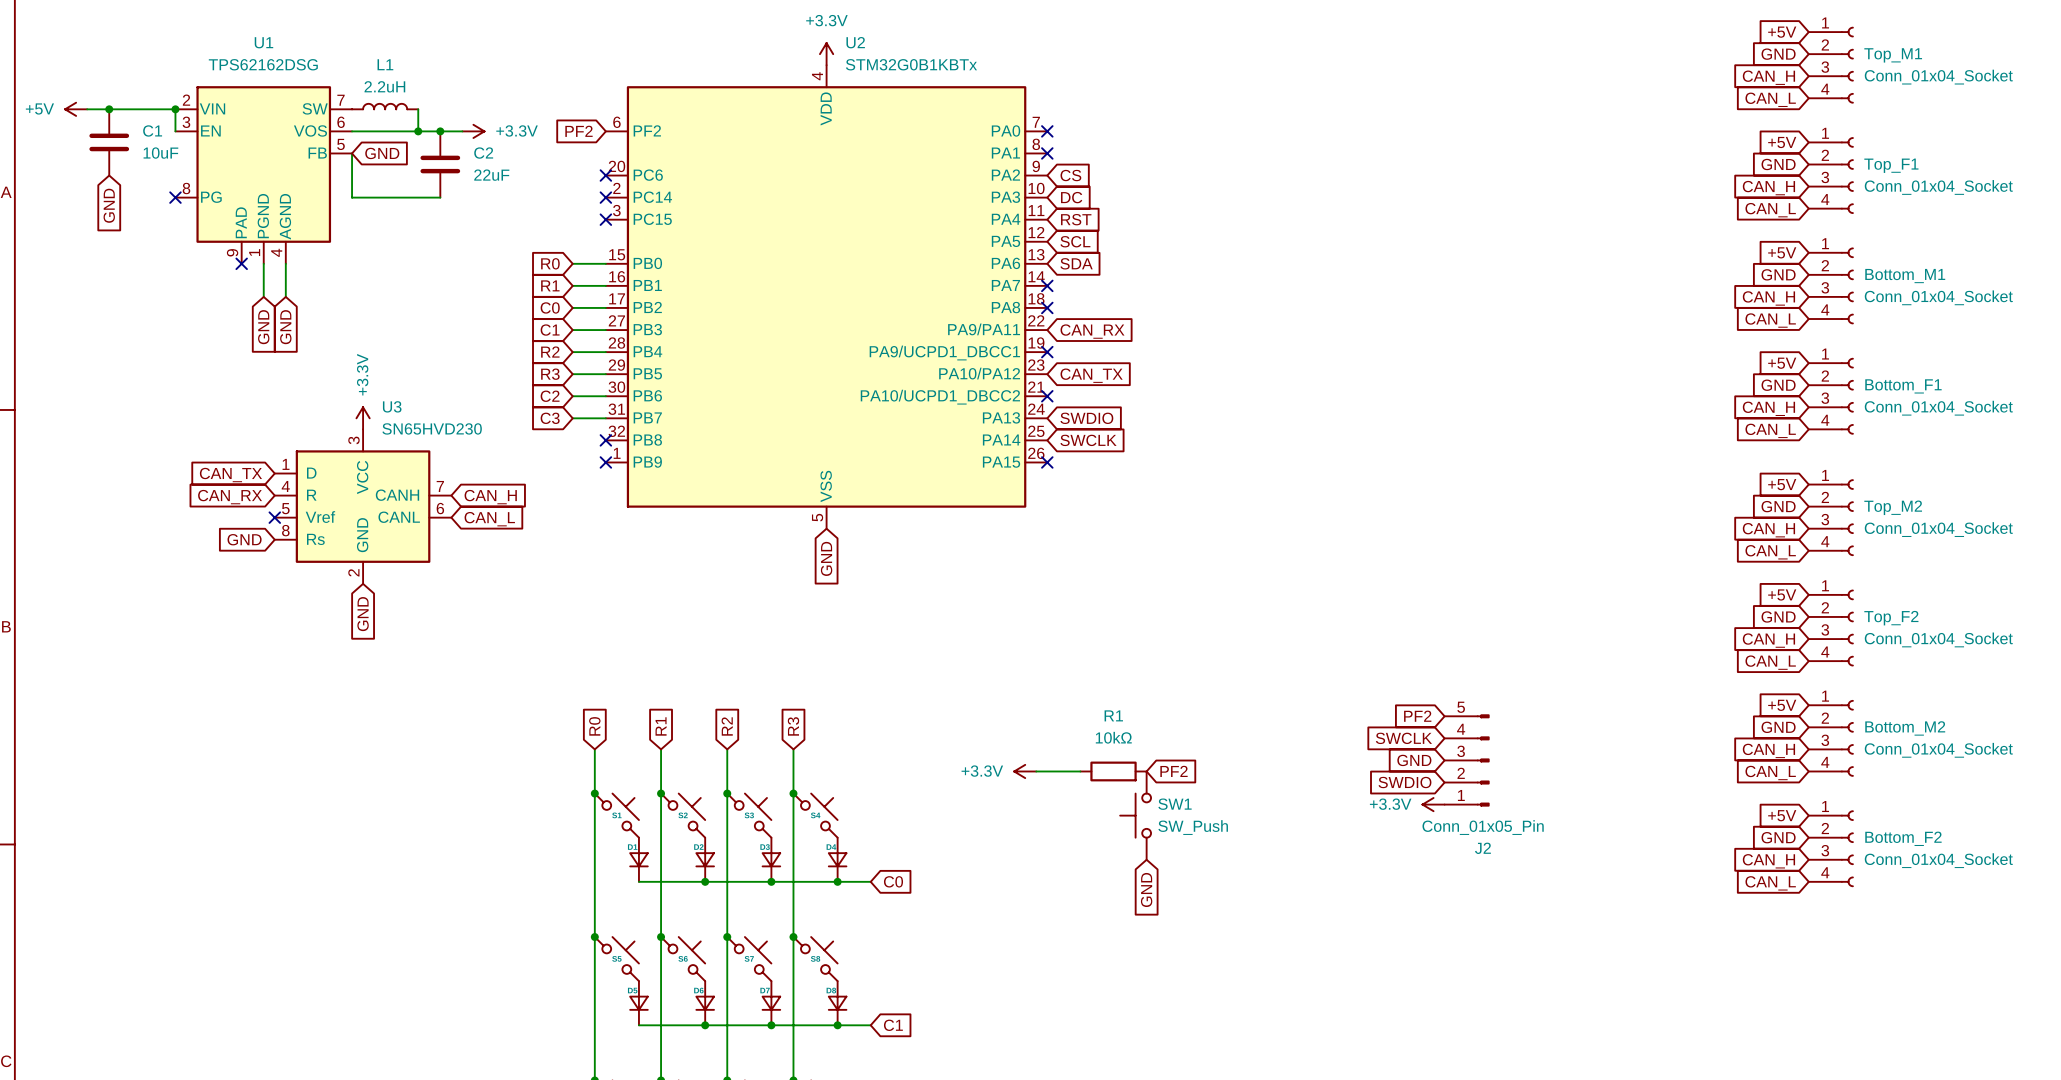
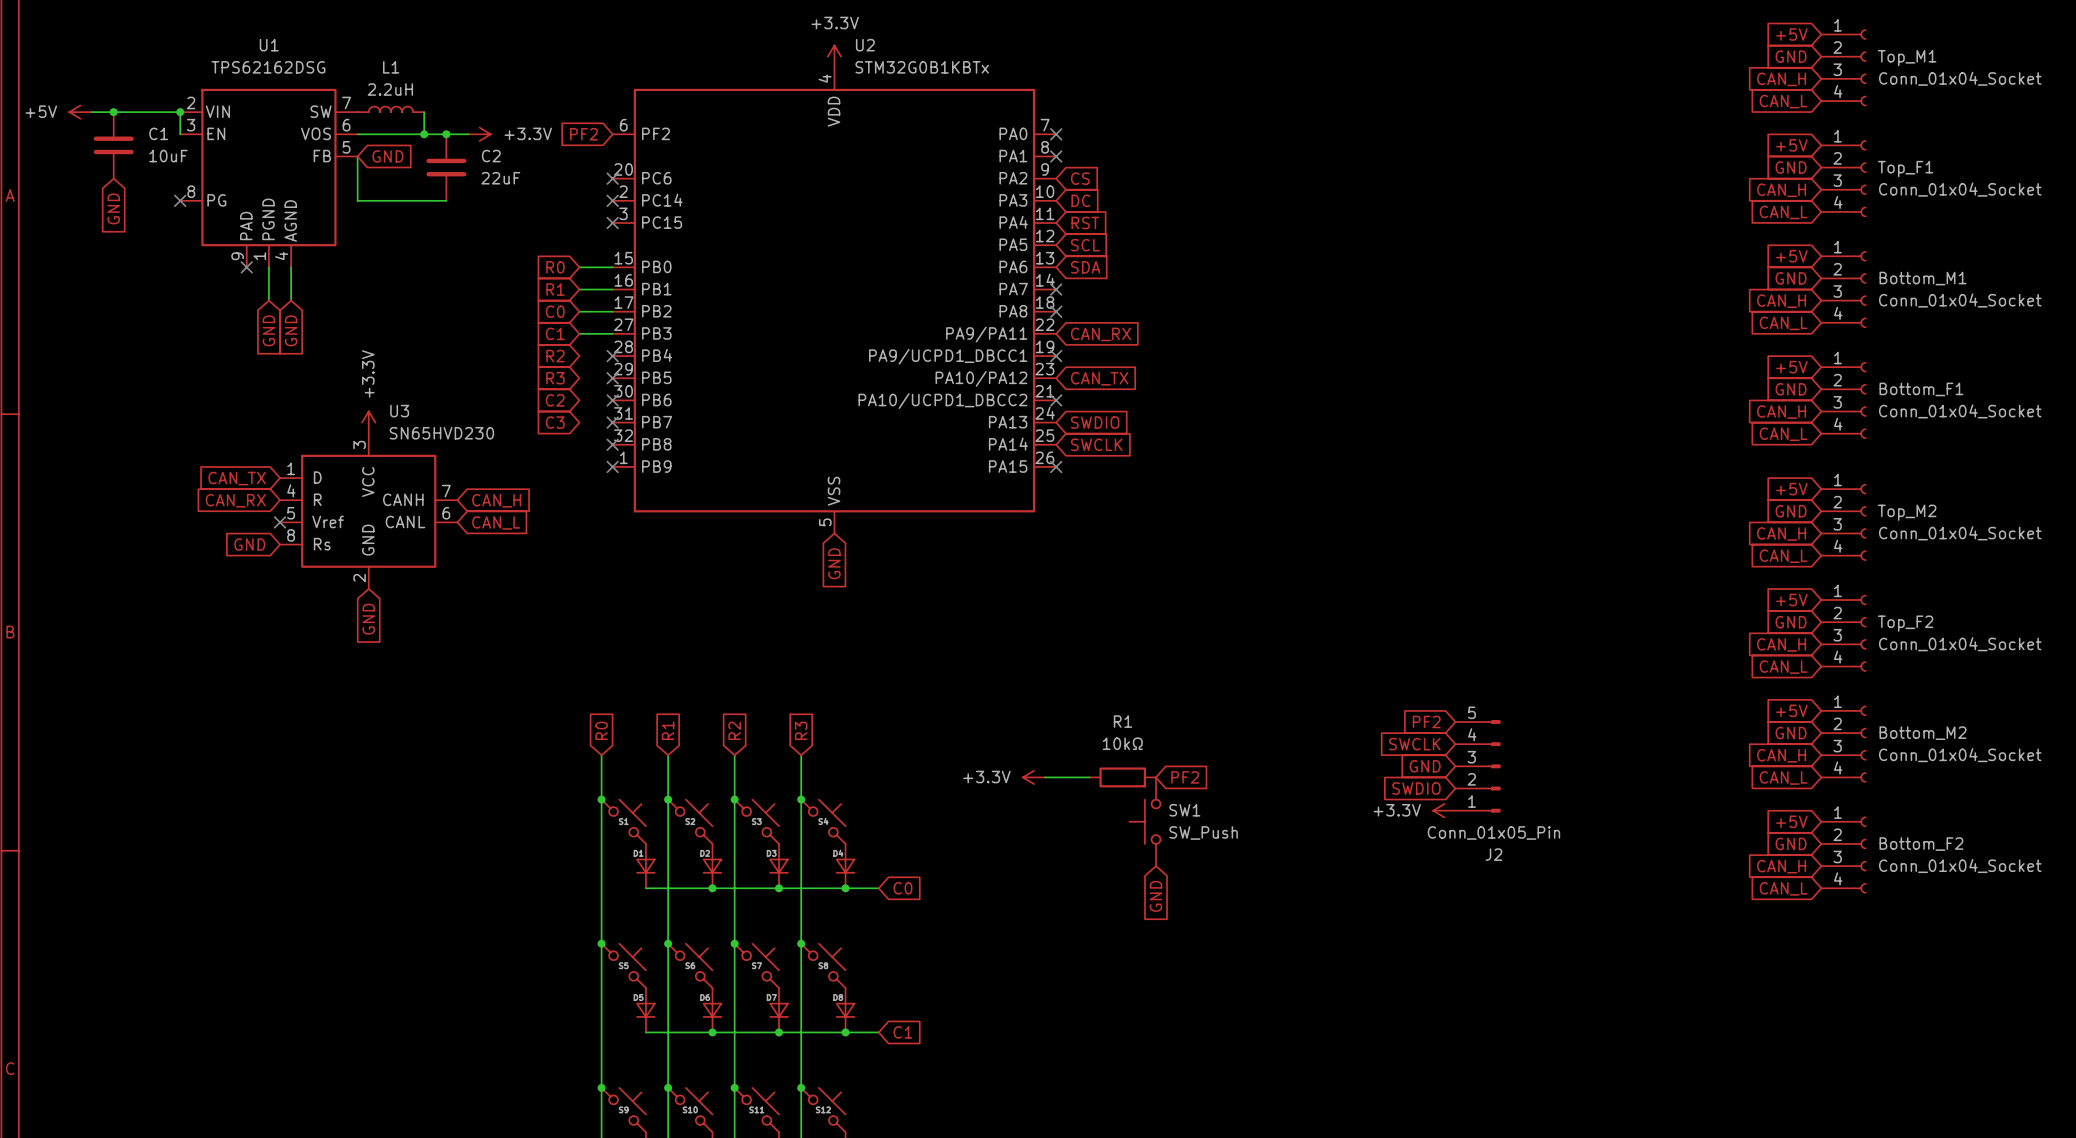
wire: (572, 352) (605, 352) -> none
no-connect mark: none -> (612, 356)
wire: (572, 374) (605, 374) -> none
no-connect mark: none -> (612, 378)
wire: (572, 396) (605, 396) -> none
no-connect mark: none -> (612, 400)
wire: (572, 418) (605, 418) -> none
no-connect mark: none -> (612, 422)

